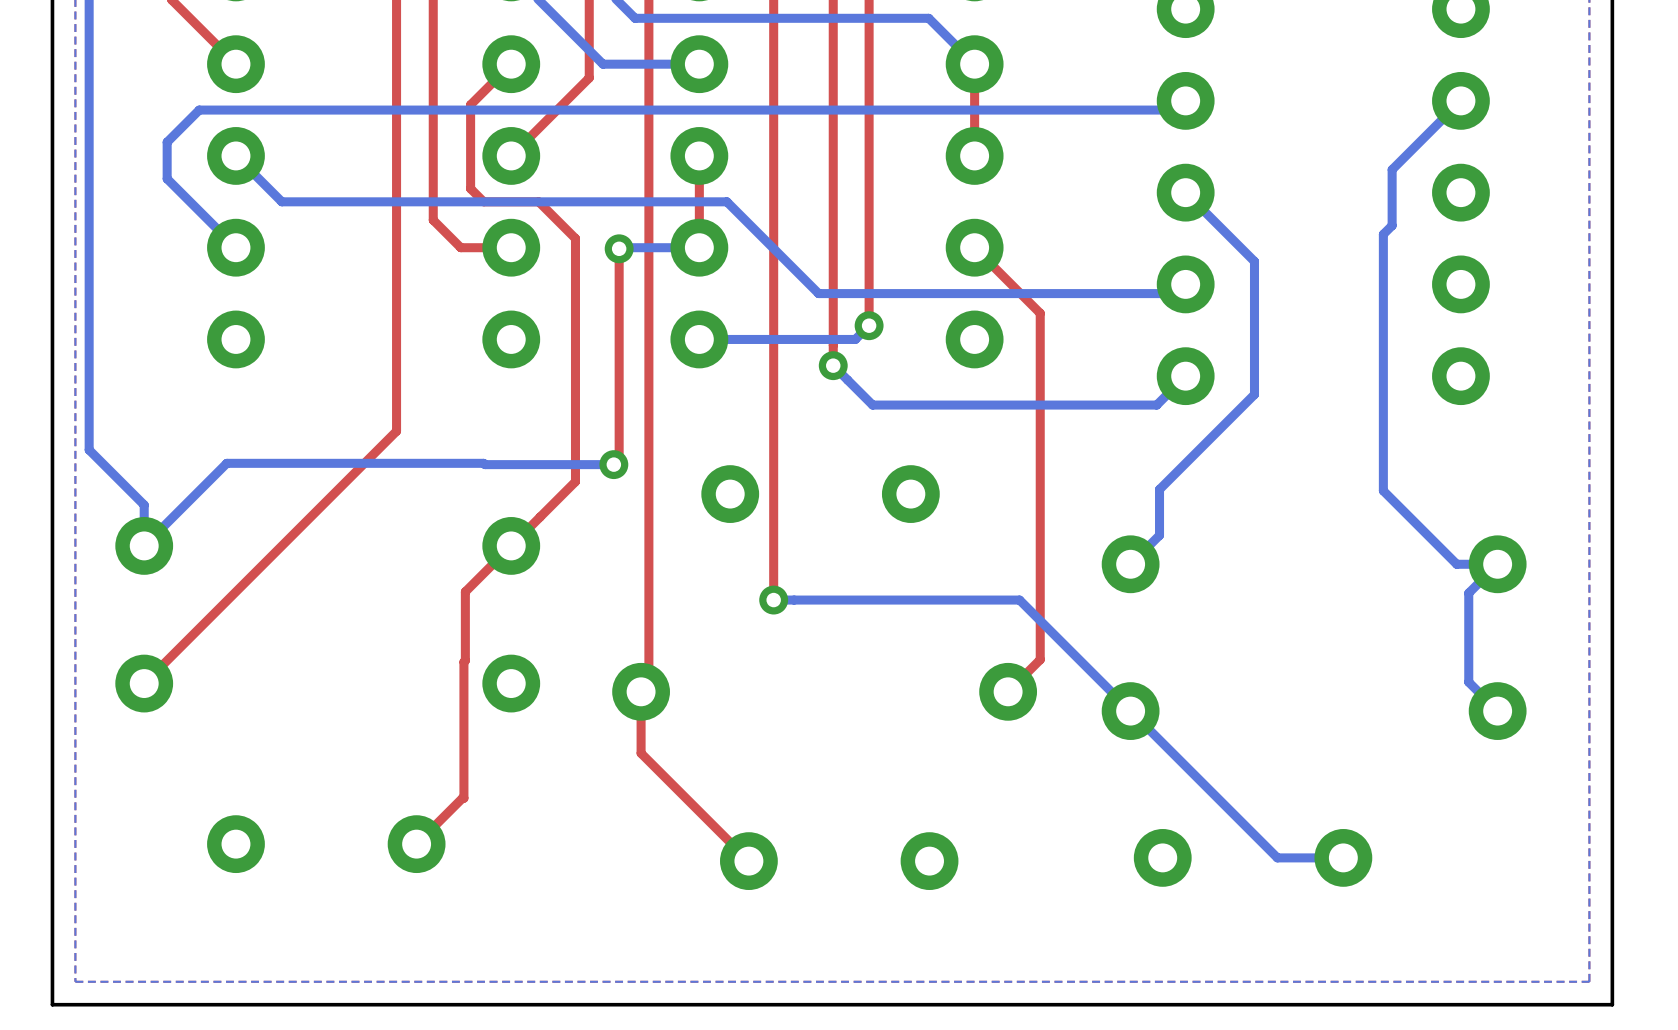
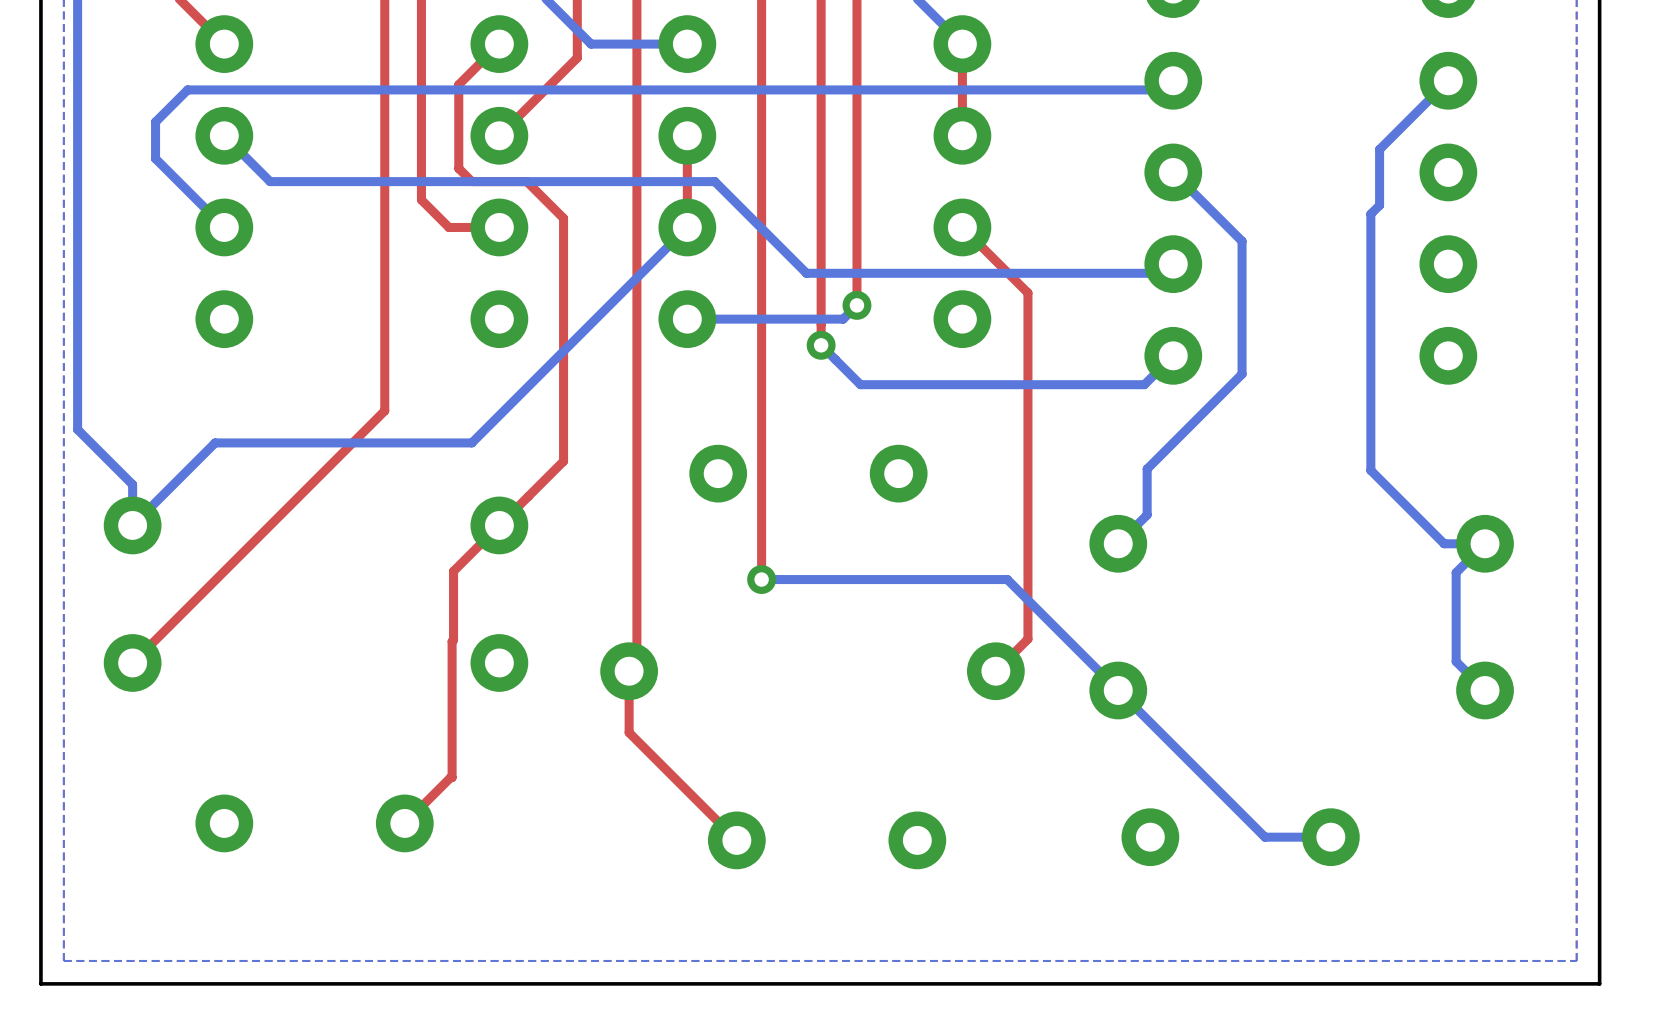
bottom track: (699, 247) (619, 248) -> none
top track: (619, 248) (619, 459) (613, 464) -> none
via: (619, 248) -> none
bottom track: (483, 463) (613, 464) -> (471, 442) (687, 227)
via: (613, 464) -> none

